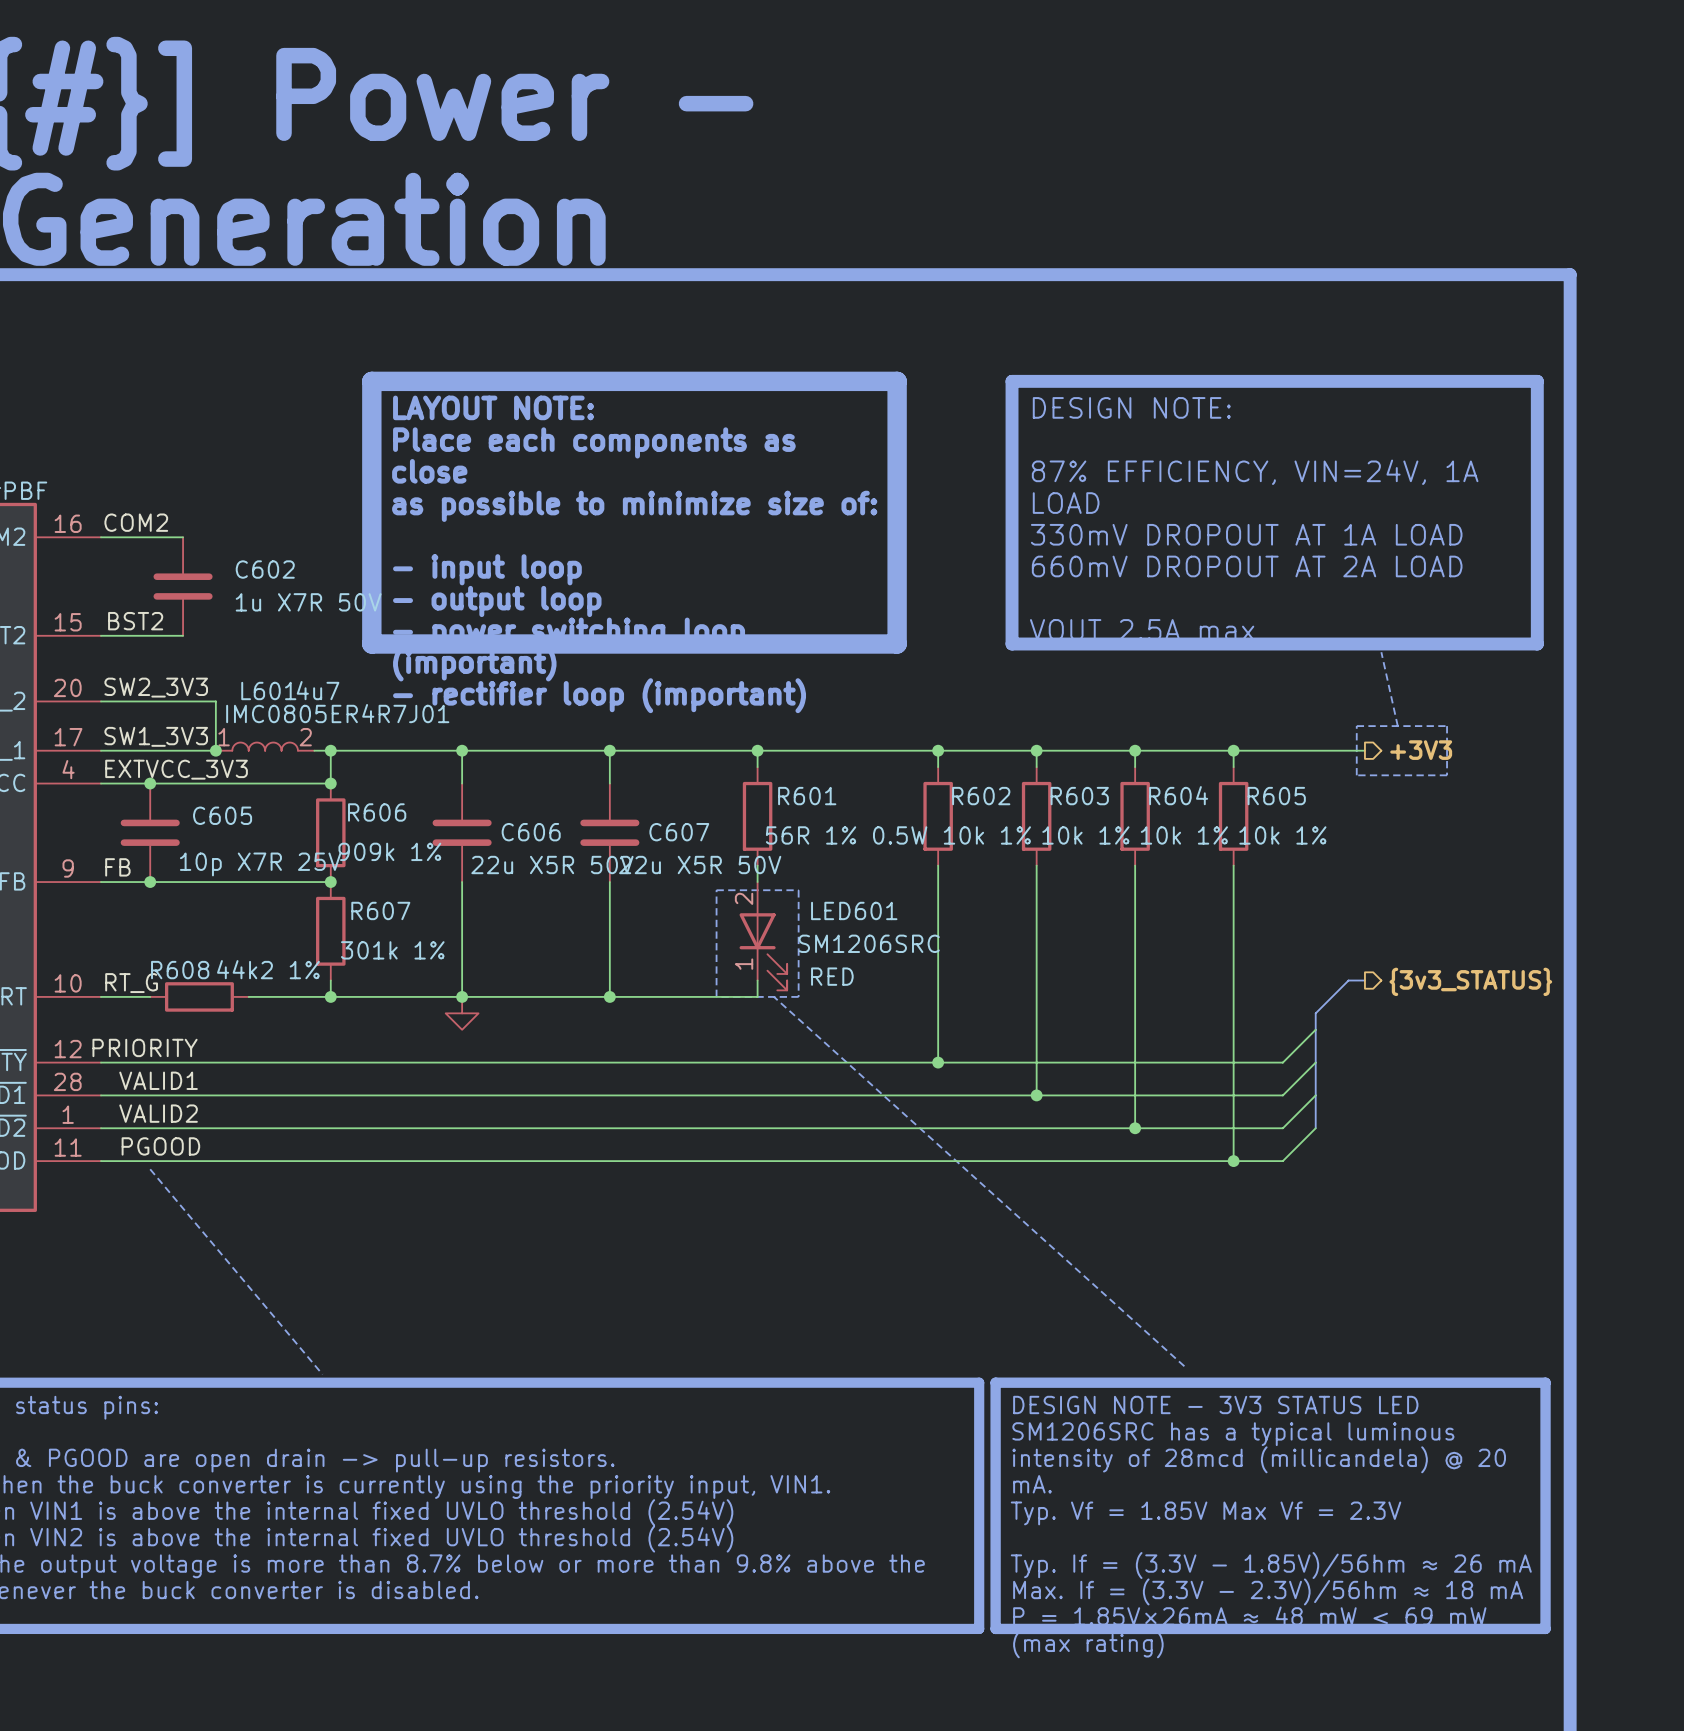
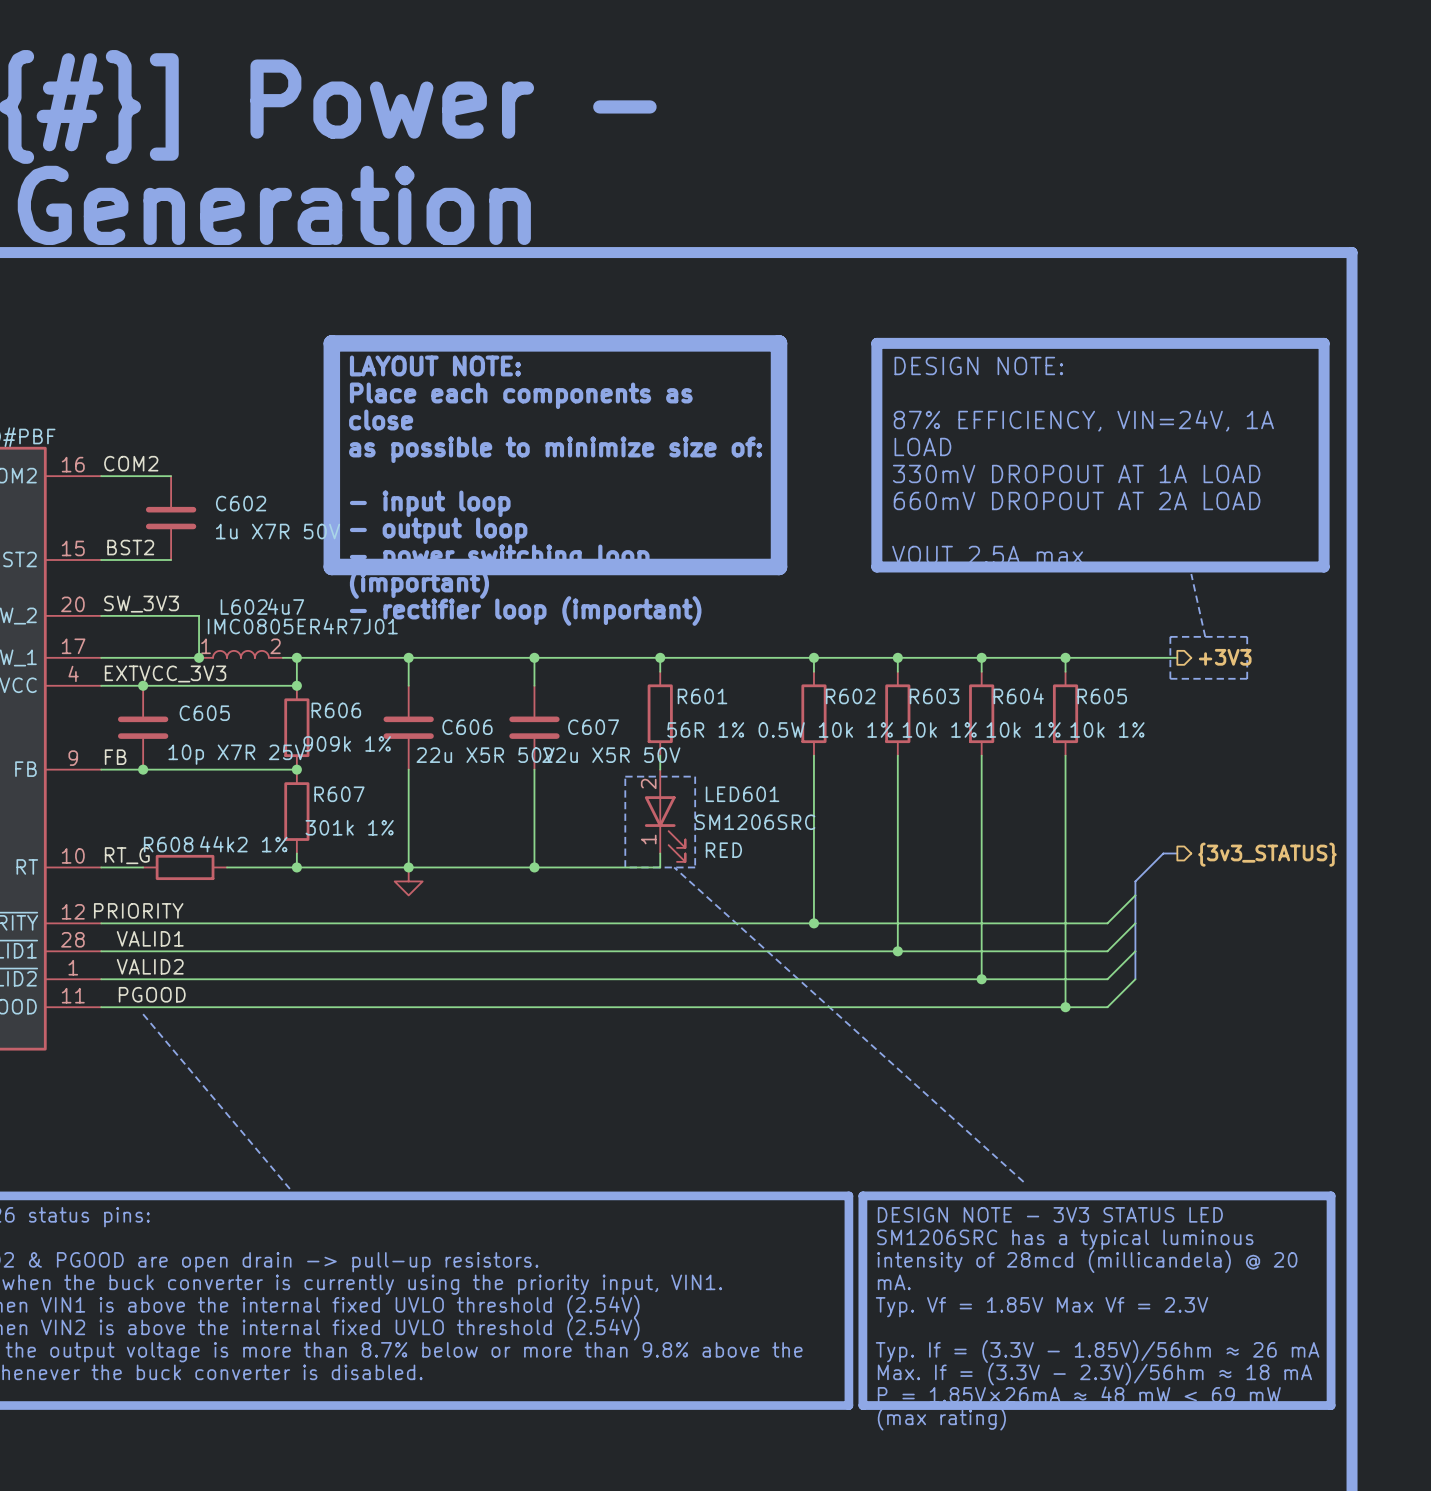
label: SW2_3V3 (156, 687) -> SW_3V3 (141, 604)
L601 name: L601 (268, 691) -> L602 (244, 607)
label: SW1_3V3 (156, 736) -> none

